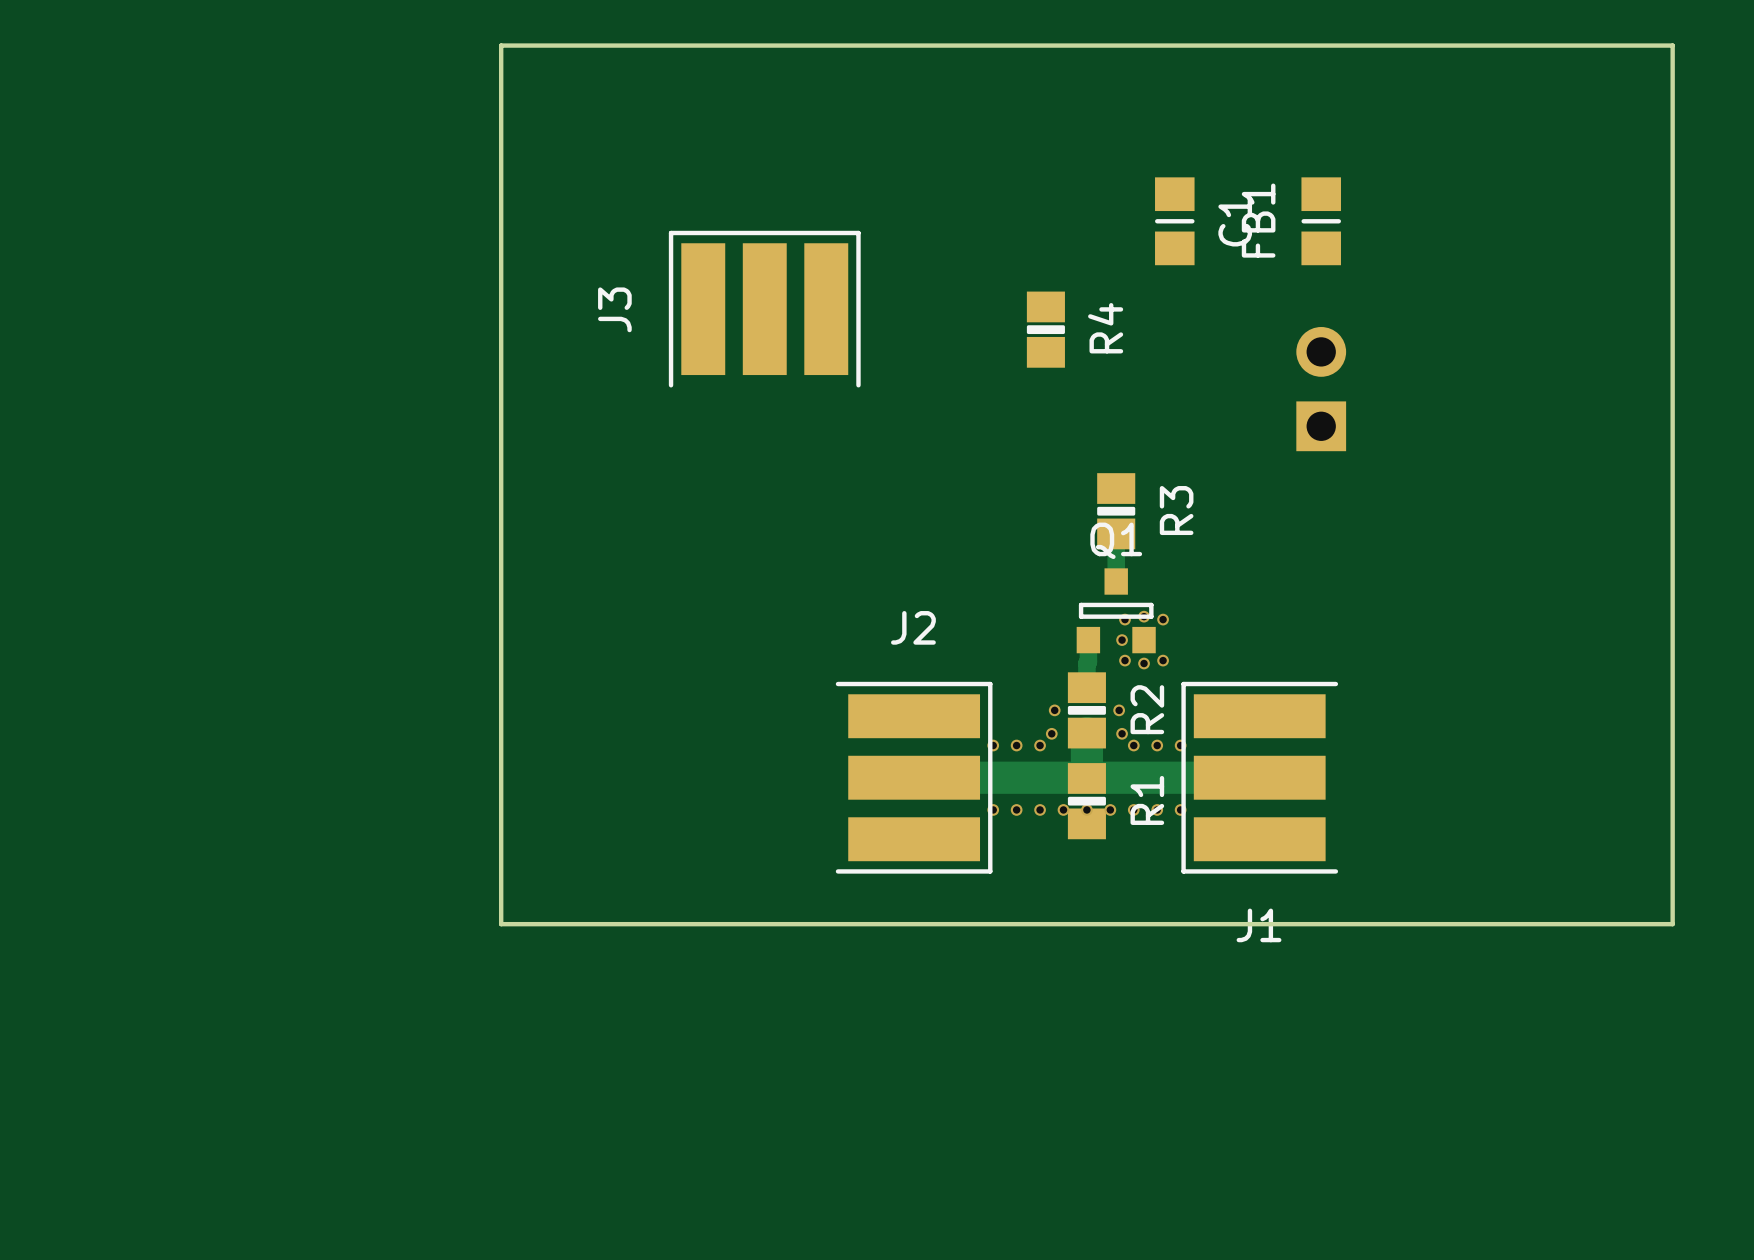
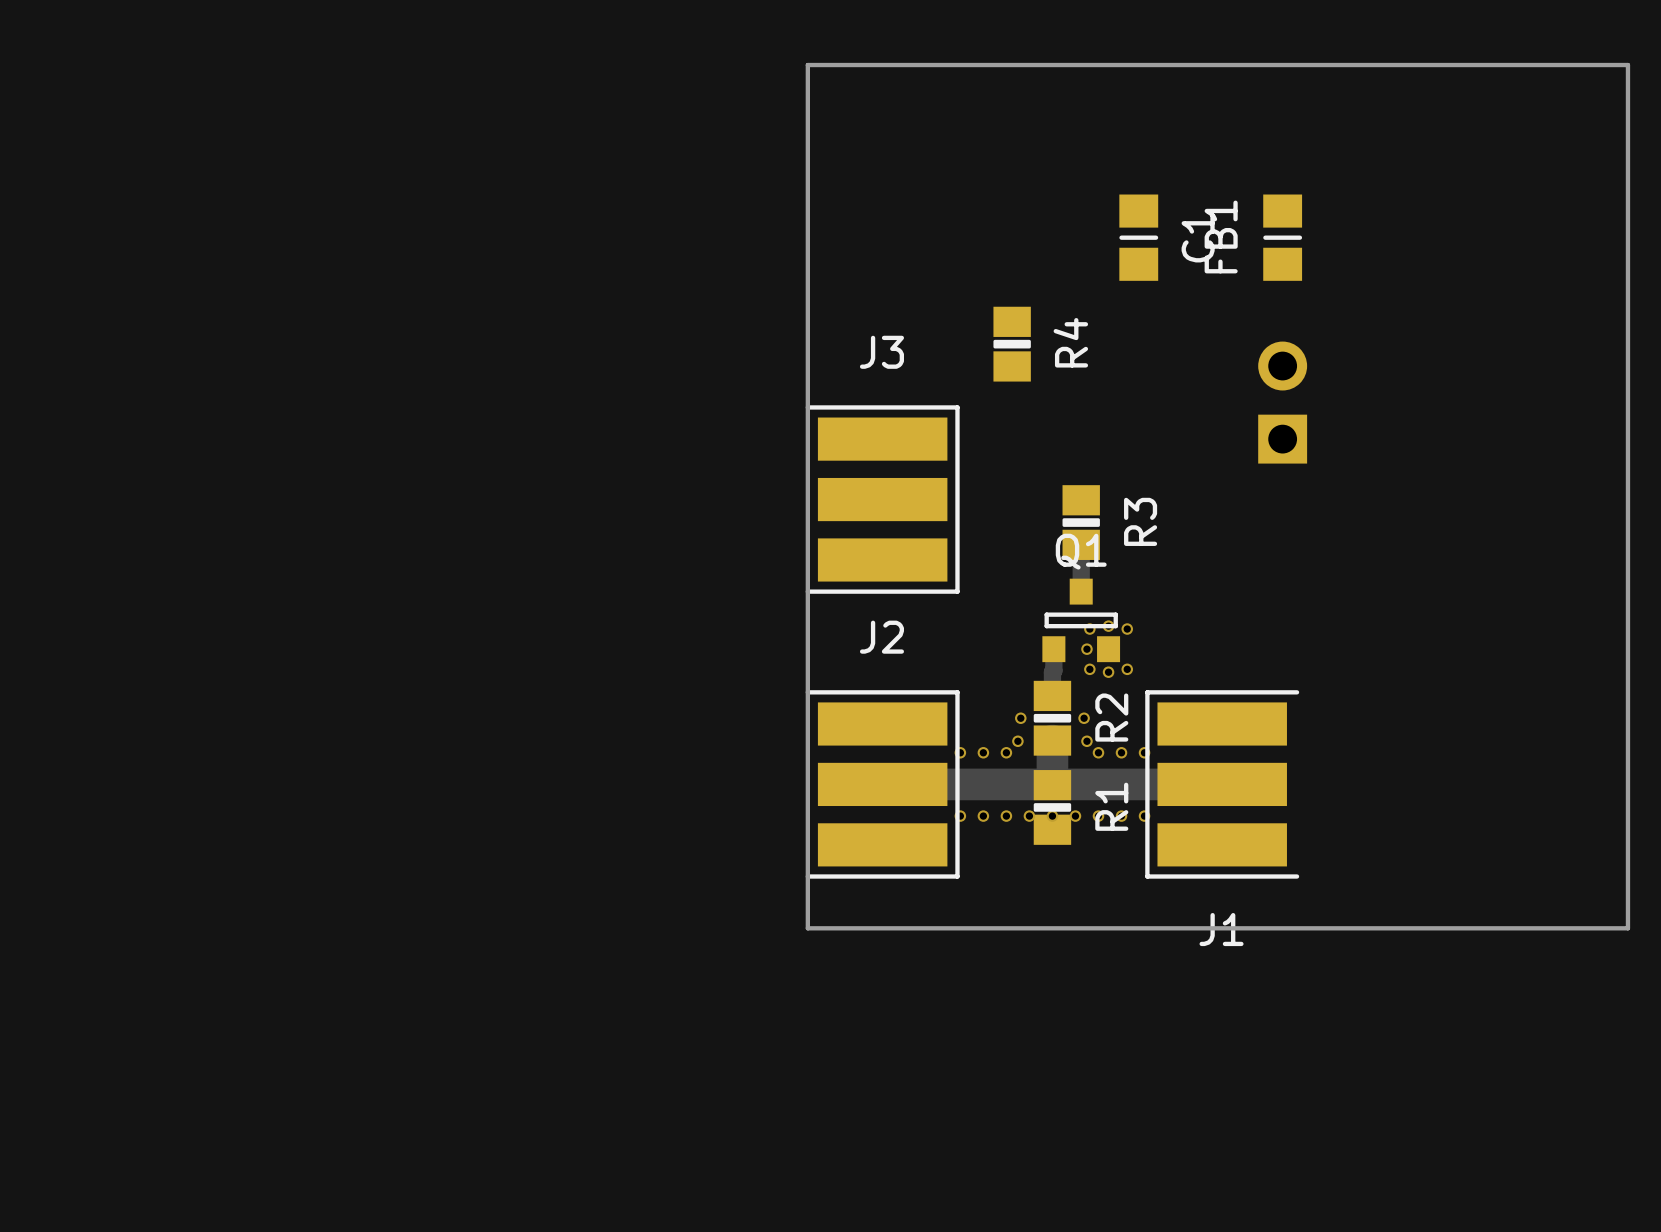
board edge: (837, 45) (501, 45) (501, 924) (837, 924) -> (807, 65) (807, 928)
J3 rotation: 0° (764, 309) -> 90° clockwise (882, 499)
J3 position: (764, 309) -> (882, 499)

